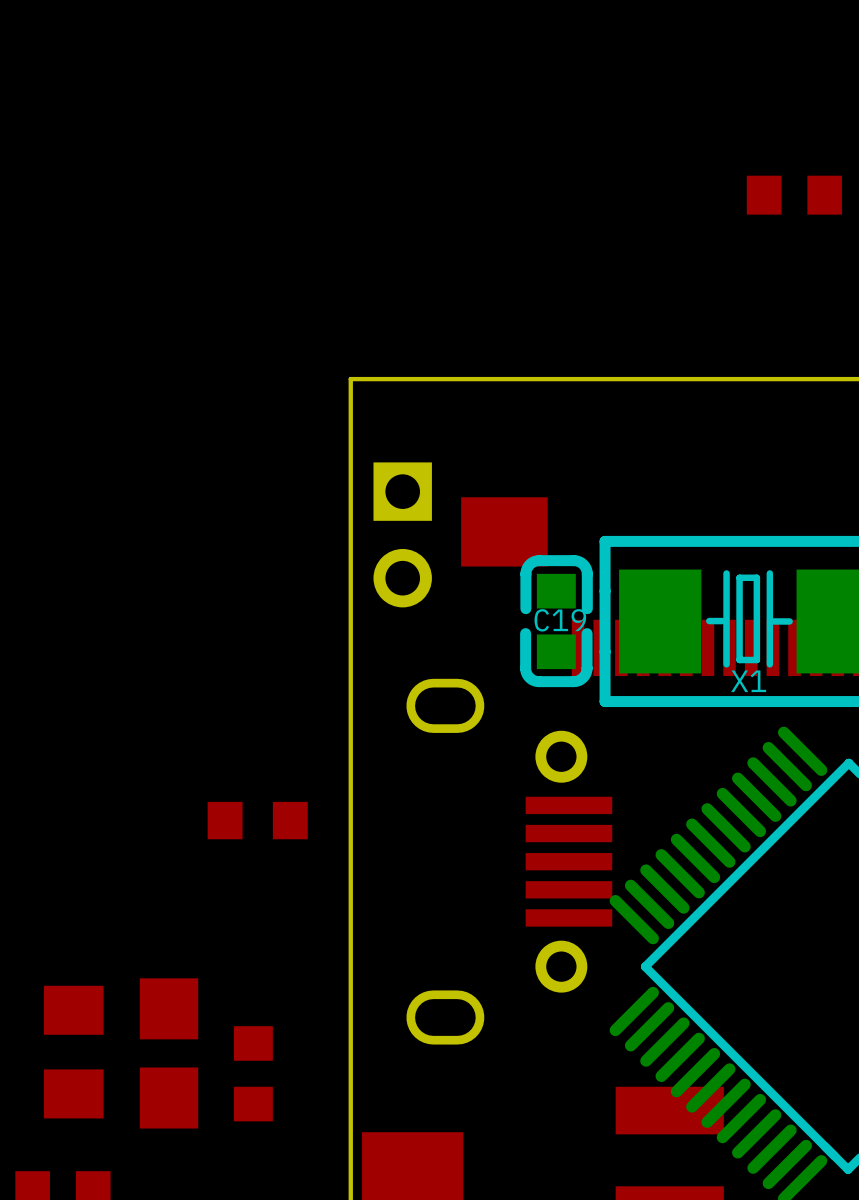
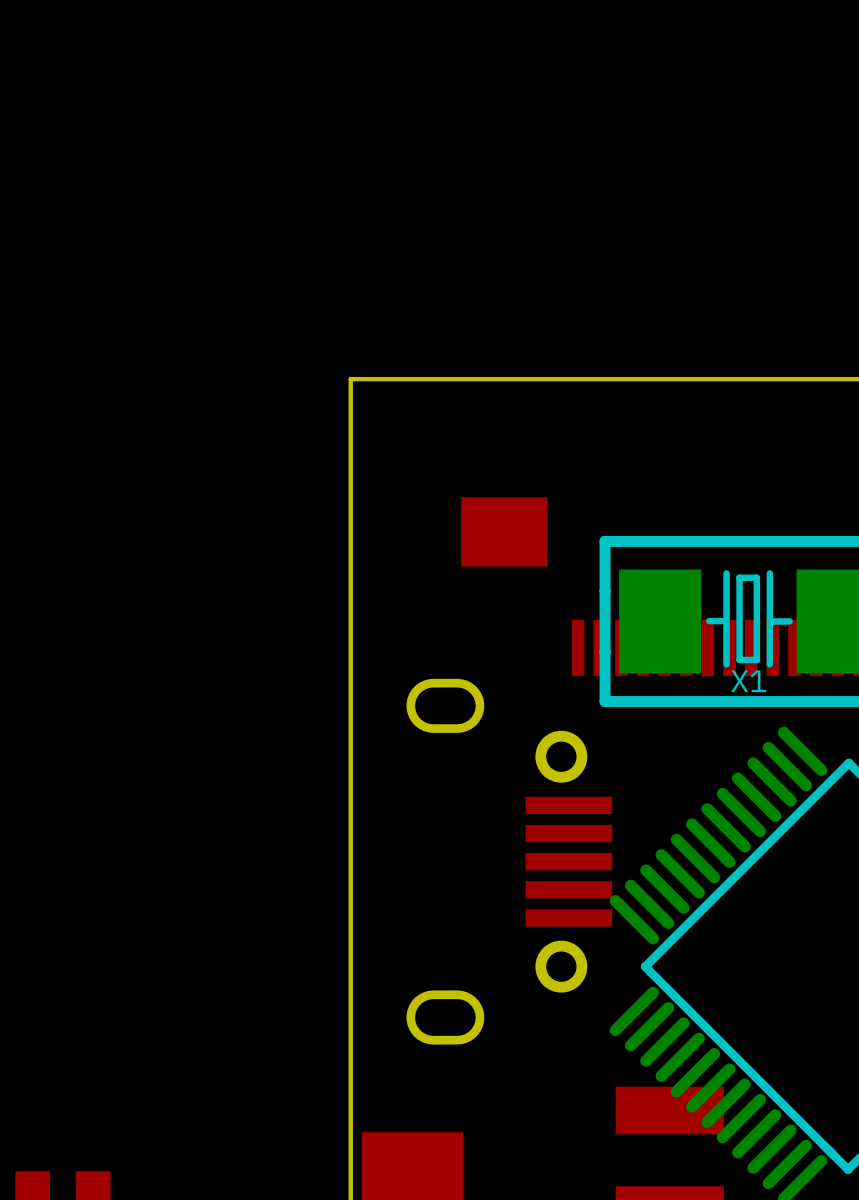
part: (794, 195) -> none
part: (402, 534) -> none
C19: (556, 621) -> none
part: (257, 820) -> none
part: (73, 1052) -> none
part: (168, 1053) -> none
part: (253, 1073) -> none

